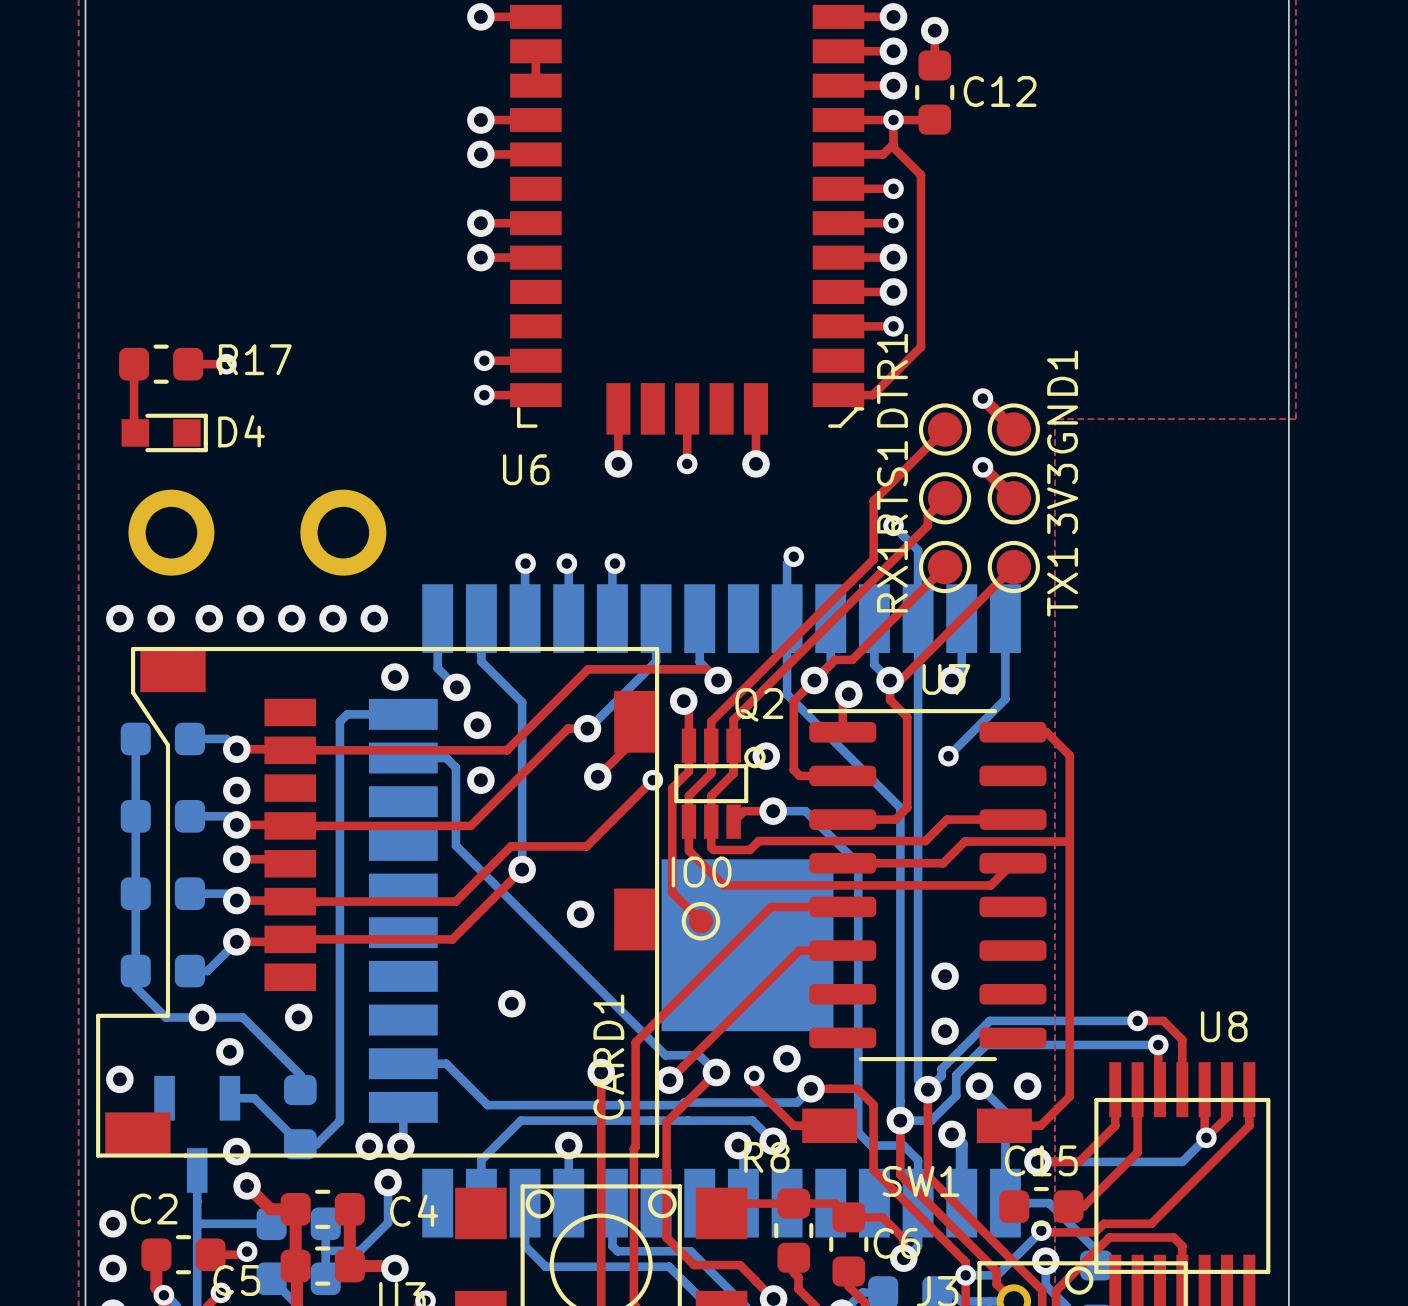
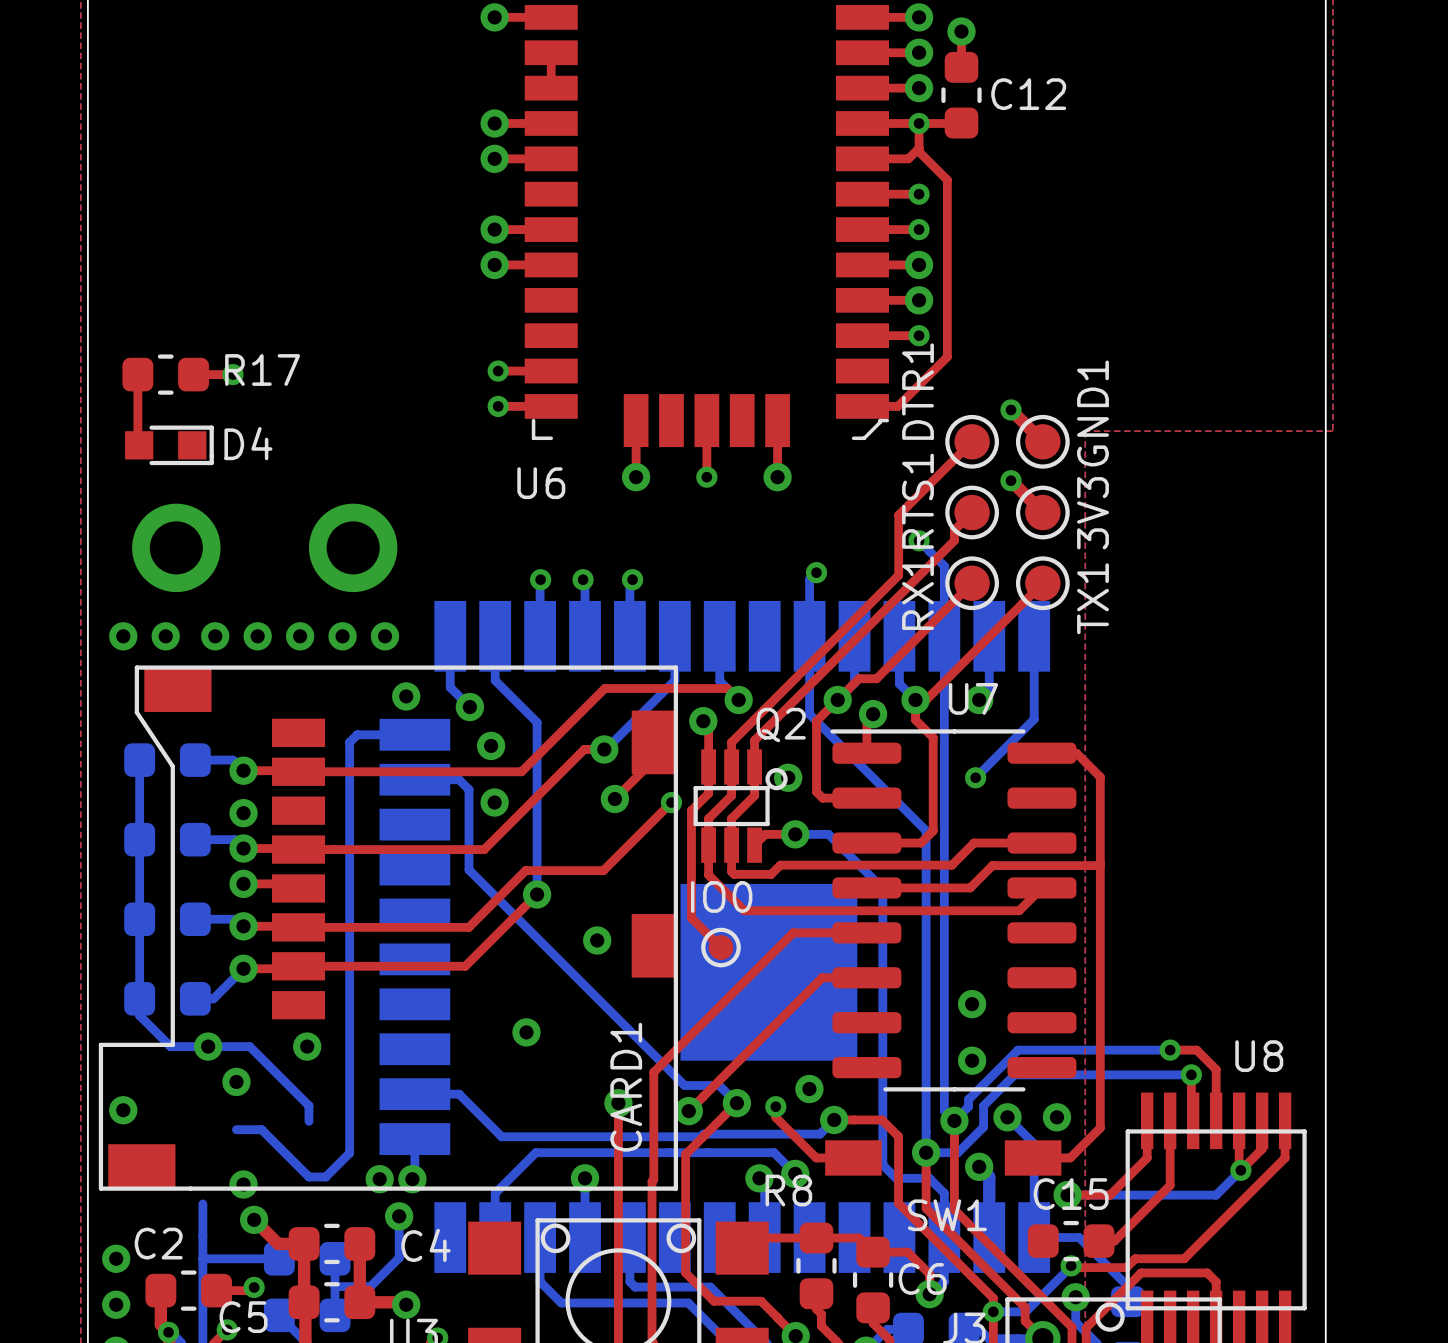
part: (300, 1117) -> none
part: (197, 1134) -> none

